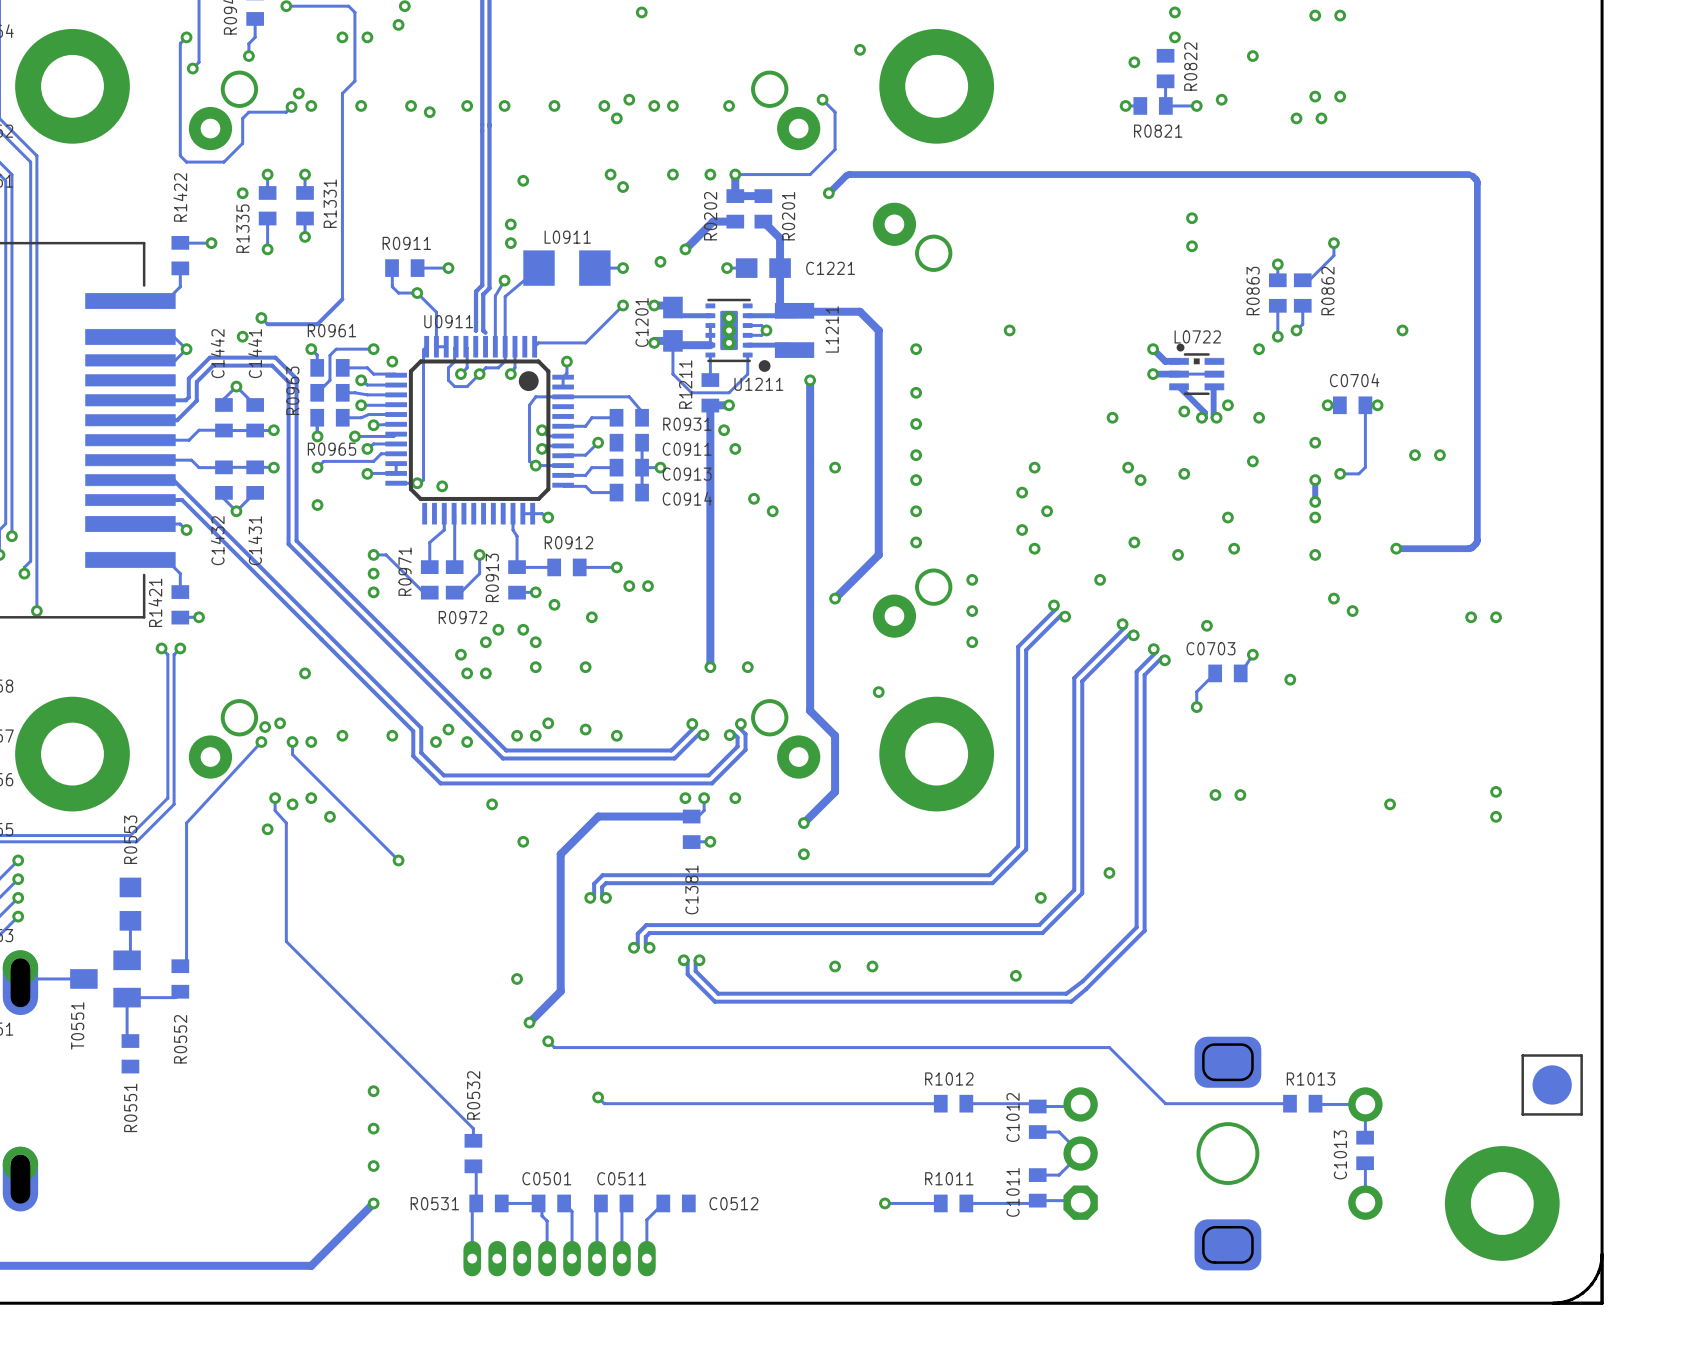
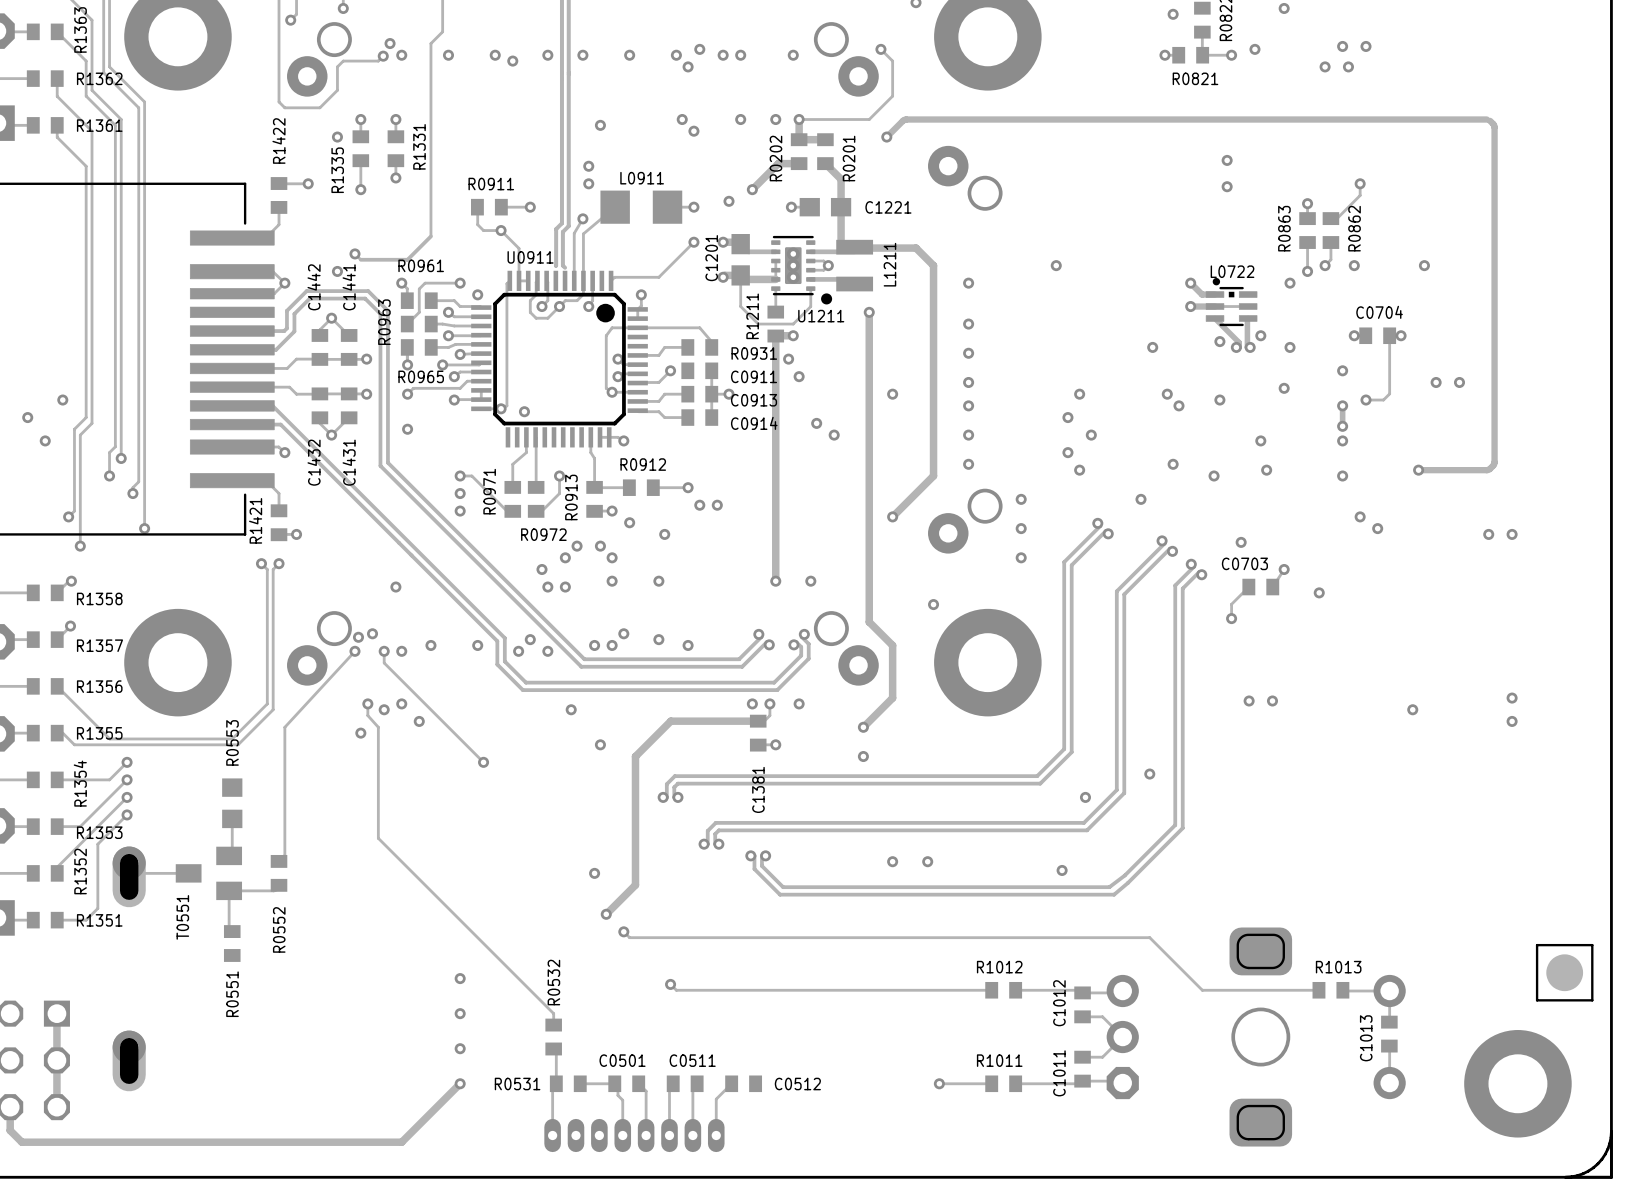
via: none -> (1354, 265)

